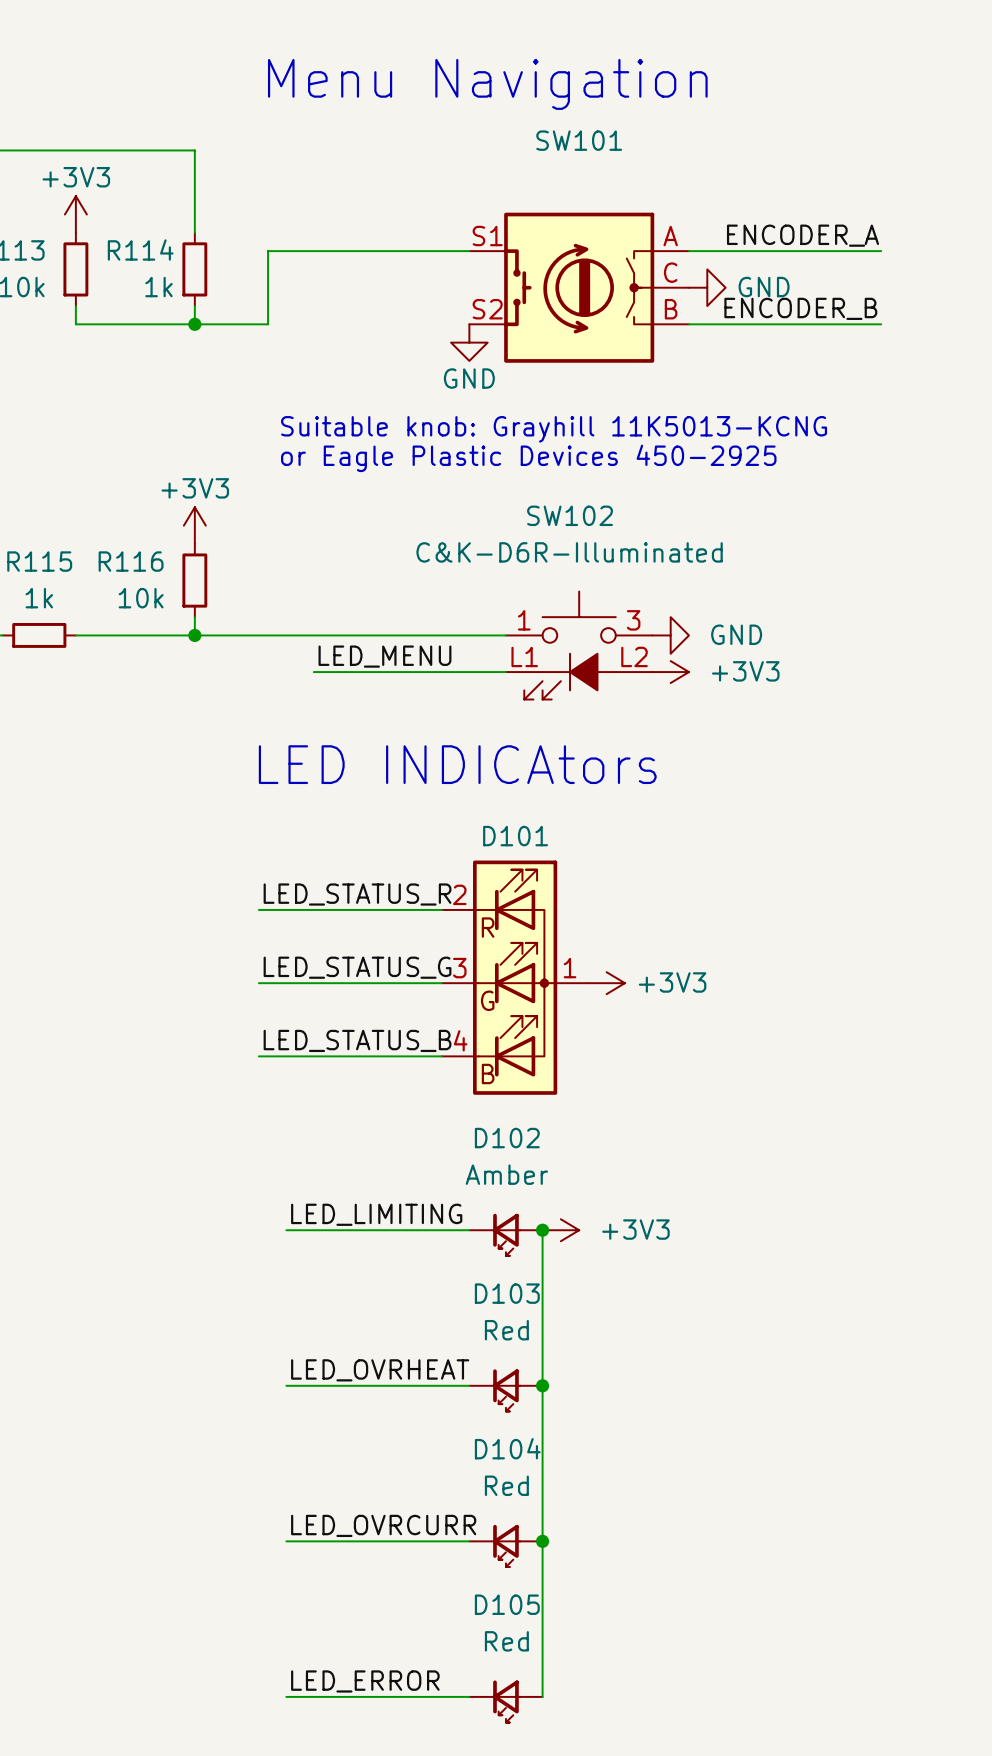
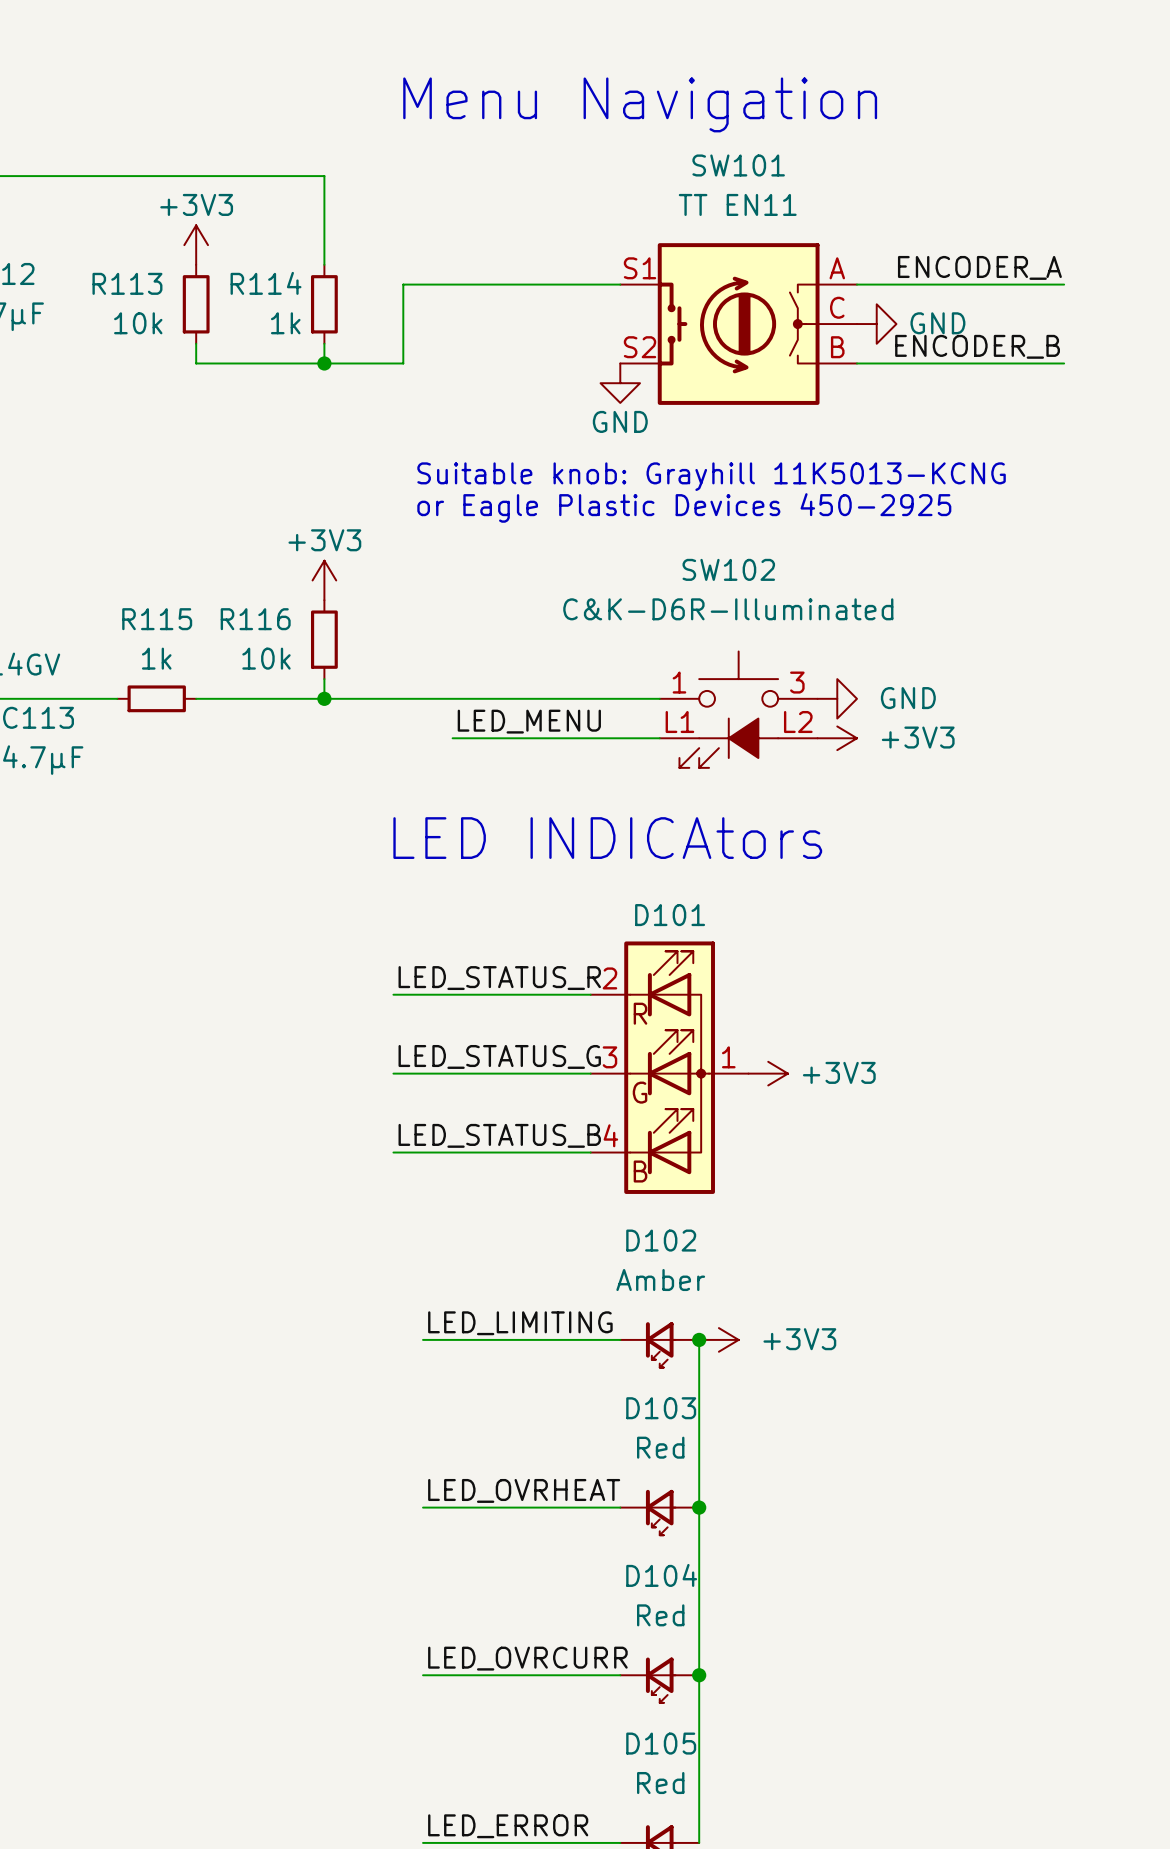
SW101 value: none -> TT EN11 (737, 204)

